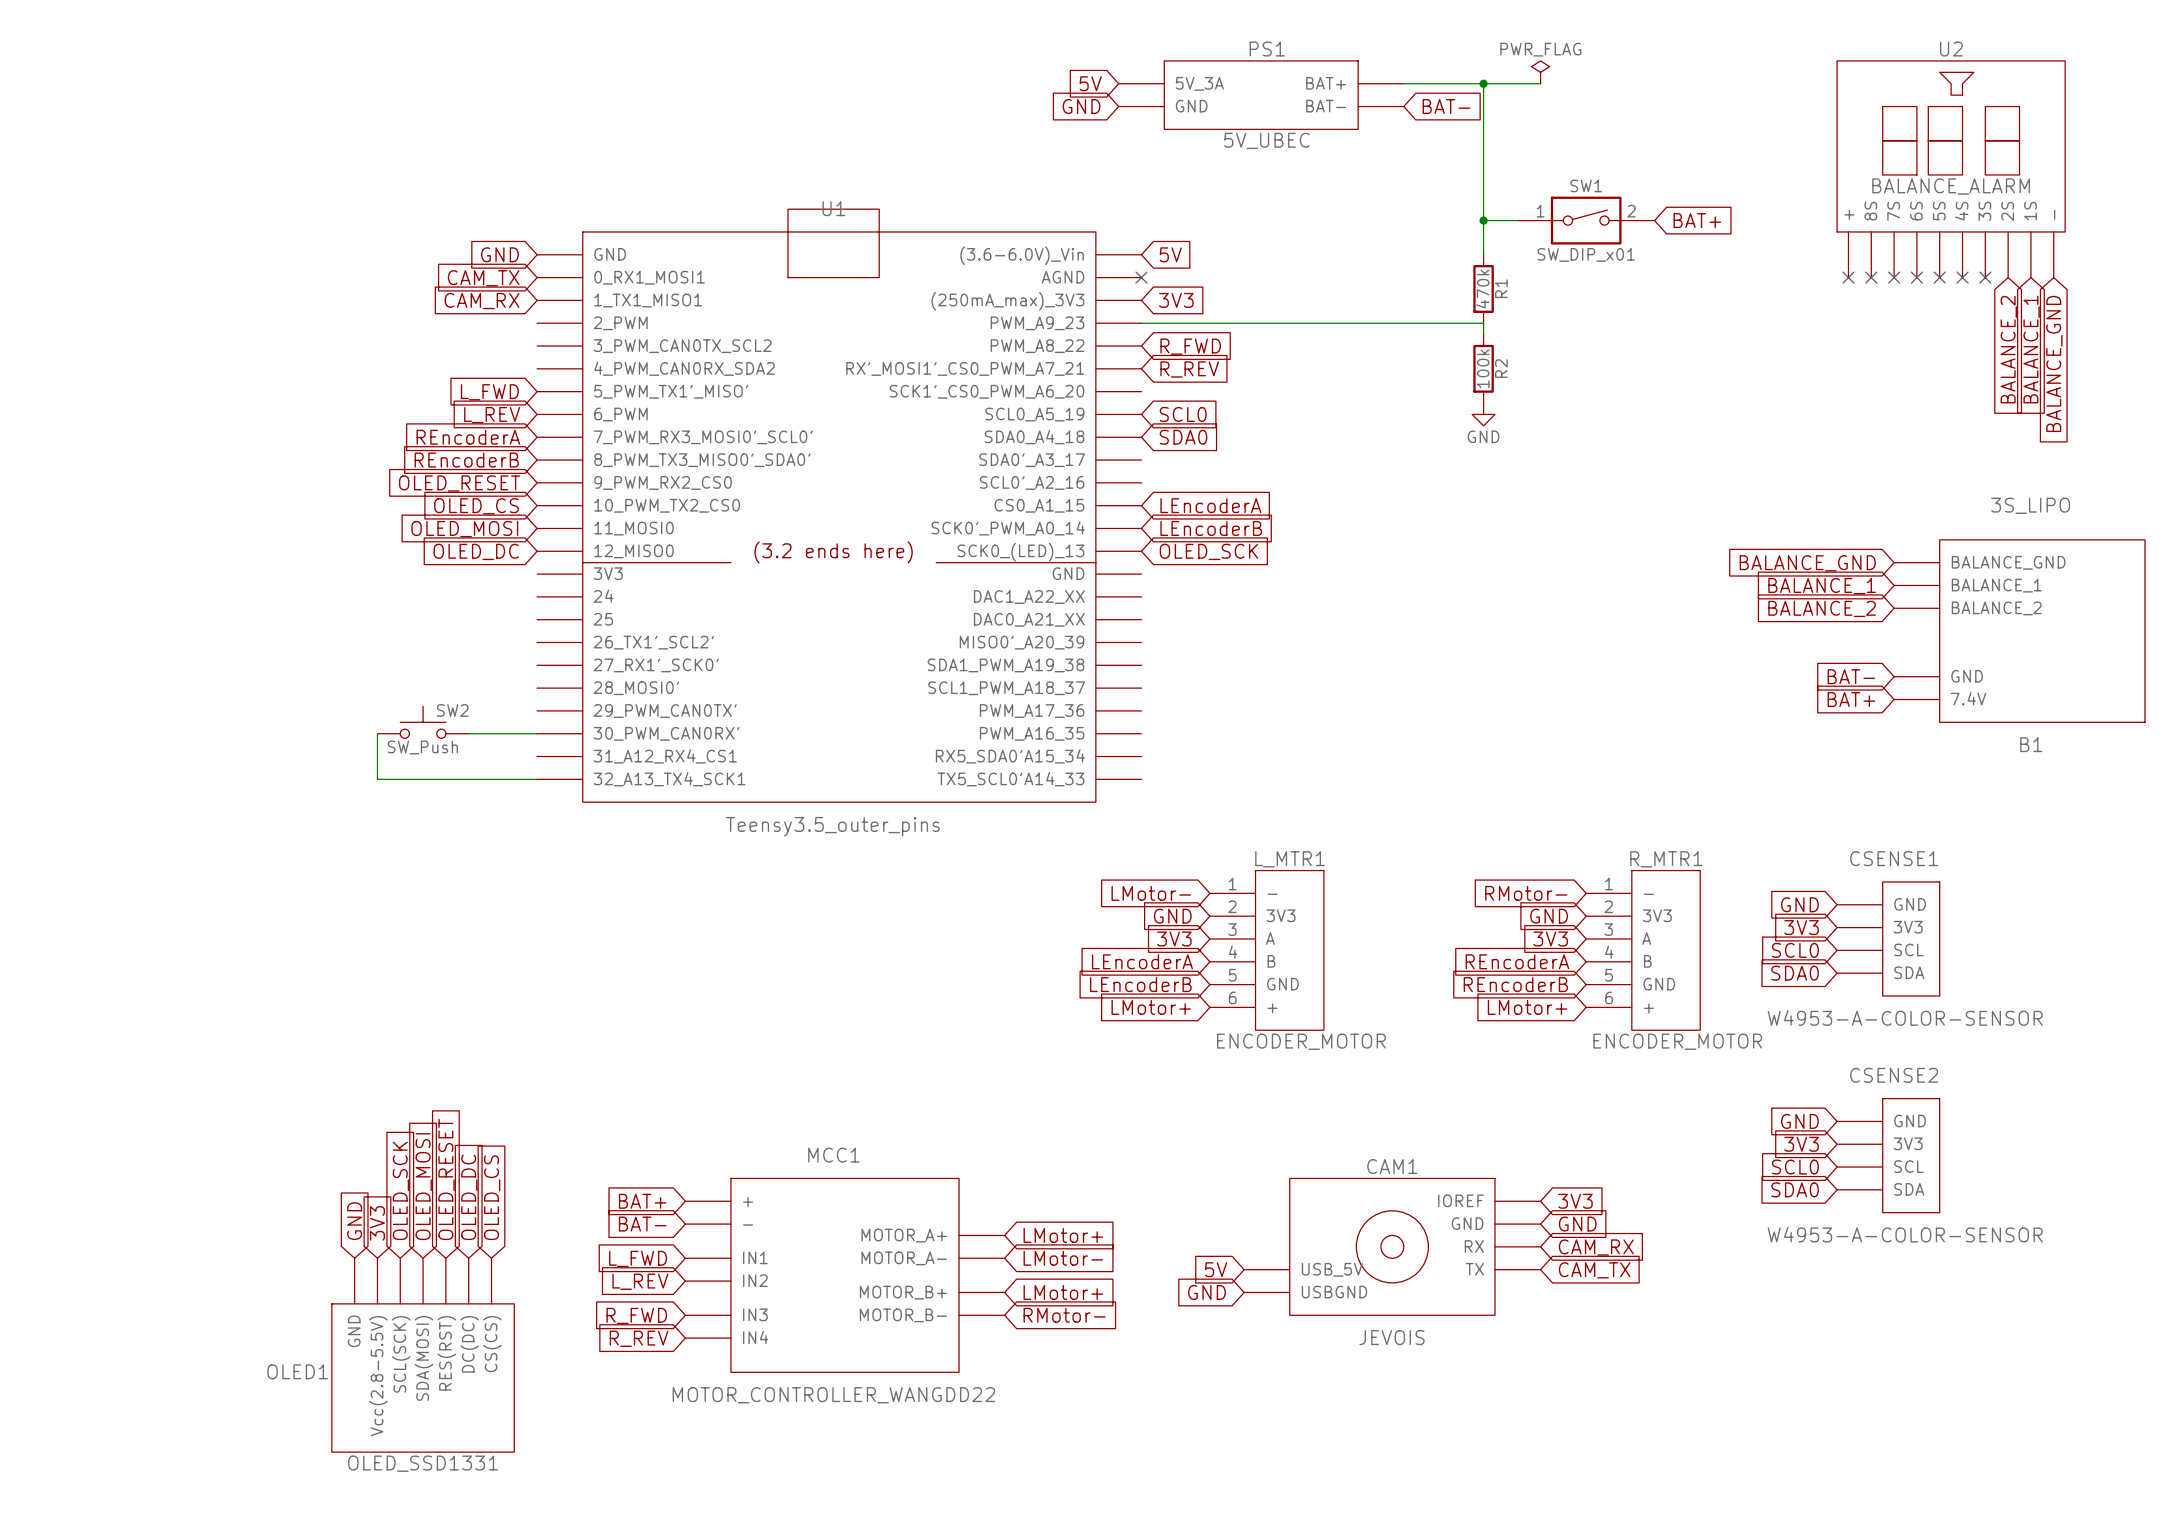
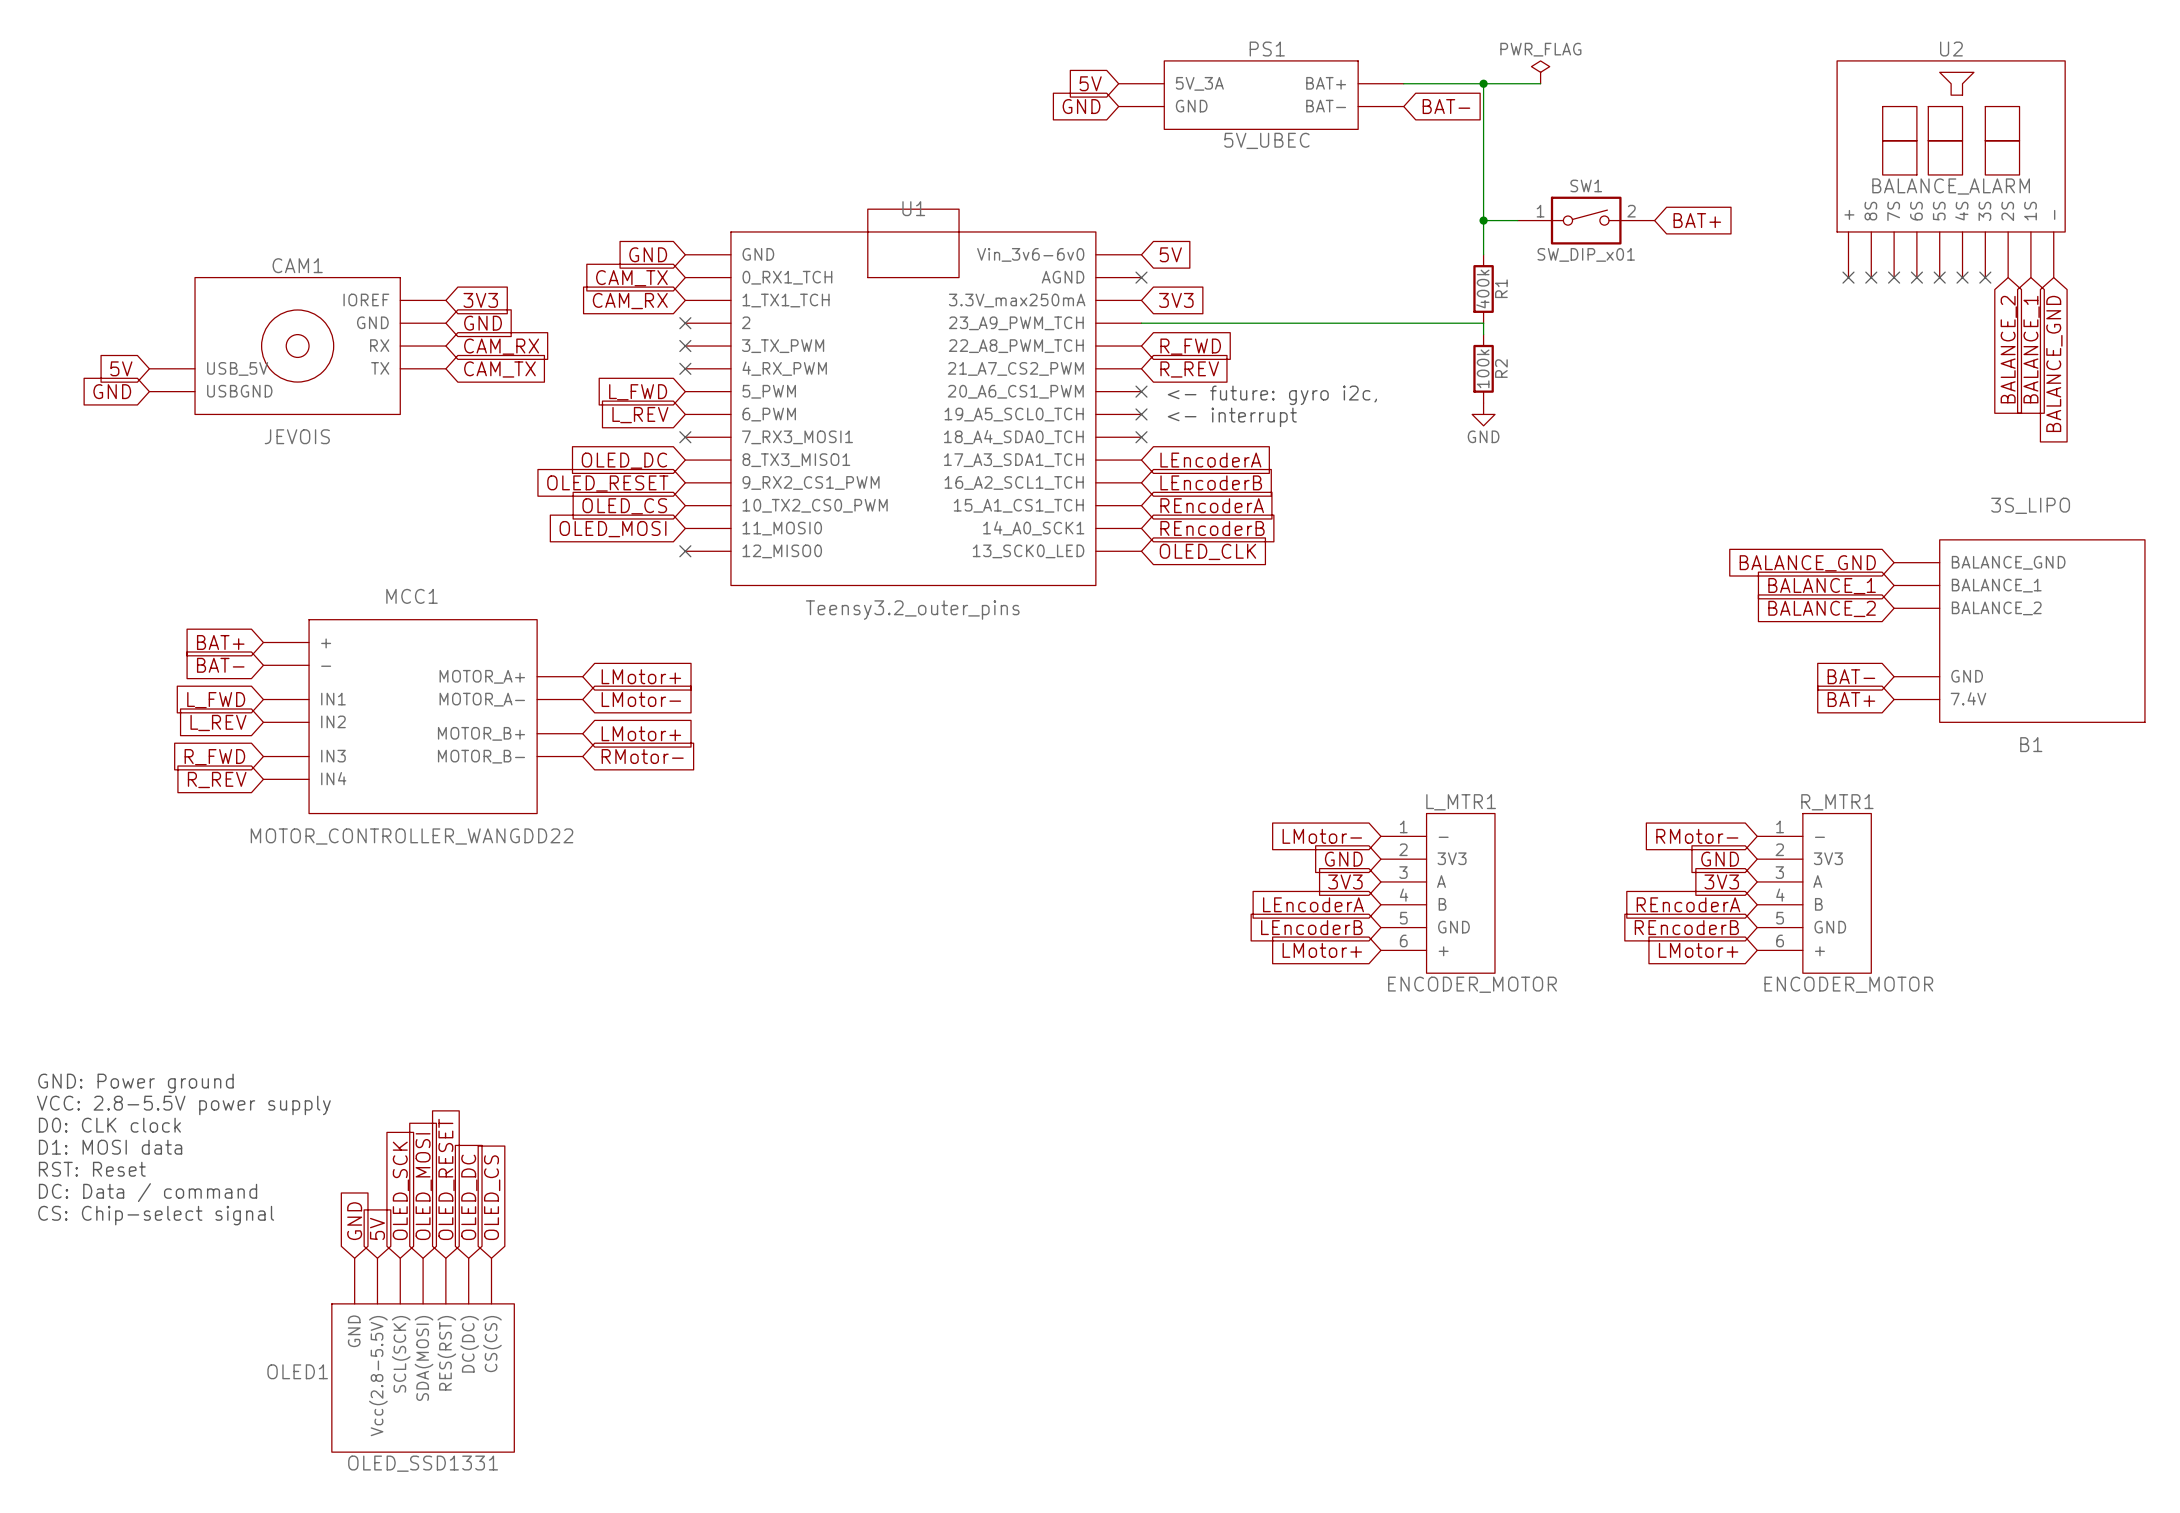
U1 name position: U1 (833, 208) -> U1 (913, 208)
U1 symbol: [537, 209, 1142, 803] -> [685, 209, 1142, 586]
global label: GND (499, 254) -> none
global label: none -> GND (648, 254)
global label: CAM_TX (483, 278) -> none
global label: none -> CAM_TX (631, 278)
R1 value: 470k (1482, 289) -> 400k (1482, 289)
global label: none -> 3V3 (480, 300)
global label: CAM_RX (482, 301) -> none
global label: none -> CAM_RX (630, 301)
global label: none -> GND (483, 323)
no-connect mark: none -> (685, 323)
global label: none -> CAM_RX (501, 346)
no-connect mark: none -> (685, 346)
global label: none -> 5V (121, 368)
no-connect mark: none -> (685, 368)
global label: none -> CAM_TX (499, 369)
global label: none -> GND (112, 391)
no-connect mark: none -> (1141, 391)
global label position: L_FWD (489, 392) -> L_FWD (638, 392)
text: none -> <- future: gyro i2c, (1272, 395)
no-connect mark: none -> (1141, 414)
global label: SCL0 (1183, 414) -> none
global label position: L_REV (492, 415) -> L_REV (640, 415)
text: none -> <- interrupt (1232, 417)
global label: REncoderA (468, 437) -> none
no-connect mark: none -> (685, 437)
no-connect mark: none -> (1141, 437)
global label: SDA0 (1183, 437) -> none
global label: REncoderB (466, 460) -> none
global label: none -> LEncoderA (1210, 460)
global label: none -> LEncoderB (1211, 482)
global label position: OLED_RESET (459, 483) -> OLED_RESET (607, 483)
global label: LEncoderA (1210, 505) -> REncoderA (1212, 505)
global label position: OLED_CS (476, 506) -> OLED_CS (624, 506)
global label: LEncoderB (1211, 528) -> REncoderB (1212, 528)
global label position: OLED_MOSI (464, 529) -> OLED_MOSI (613, 529)
global label position: OLED_DC (476, 551) -> OLED_DC (624, 460)
no-connect mark: none -> (685, 551)
global label: OLED_SCK (1208, 551) -> OLED_CLK (1207, 551)
global label: none -> BAT+ (220, 642)
global label: none -> BAT- (220, 665)
global label: none -> LMotor+ (641, 676)
global label: none -> LMotor- (641, 699)
global label: none -> L_FWD (216, 700)
global label: none -> L_REV (218, 722)
SW2: SW_Push (423, 722) -> none
wire: (377, 733) (377, 779) (537, 779) -> none
wire: (468, 733) (537, 733) -> none
global label: none -> LMotor+ (641, 733)
global label: none -> RMotor- (642, 756)
global label: none -> R_FWD (214, 757)
global label: none -> R_REV (217, 779)
U1 value: Teensy3.5_outer_pins (832, 826) -> Teensy3.2_outer_pins (912, 610)
global label: none -> GND (1343, 859)
global label: none -> GND (1720, 859)
global label: none -> 3V3 (1345, 881)
global label: none -> 3V3 (1721, 881)
global label position: LMotor- (1151, 893) -> LMotor- (1322, 836)
global label position: RMotor- (1526, 893) -> RMotor- (1697, 836)
global label: GND (1799, 904) -> none
global label: GND (1172, 916) -> none
global label: GND (1549, 916) -> none
global label: 3V3 (1801, 927) -> none
global label: 3V3 (1174, 938) -> none
global label: 3V3 (1550, 938) -> none
CSENSE1: W4953-A-COLOR-SENSOR (1888, 938) -> none
L_MTR1 position: (1266, 950) -> (1437, 893)
global label: none -> LMotor+ (1322, 950)
R_MTR1 position: (1643, 950) -> (1814, 893)
global label: none -> LMotor+ (1698, 950)
global label: SCL0 (1795, 950) -> none
global label position: LEncoderA (1142, 961) -> LEncoderA (1313, 904)
global label position: REncoderA (1517, 961) -> REncoderA (1688, 904)
global label: SDA0 (1795, 973) -> none
global label position: LEncoderB (1140, 984) -> LEncoderB (1311, 927)
global label position: REncoderB (1515, 984) -> REncoderB (1686, 927)
global label: LMotor+ (1151, 1007) -> none
global label: LMotor+ (1527, 1007) -> none
text: none -> GND: Power ground (135, 1083)
text: none -> VCC: 2.8-5.5V power supply (183, 1105)
global label: GND (1799, 1121) -> none
text: none -> D0: CLK clock (109, 1125)
global label: 3V3 (1801, 1144) -> none
text: none -> D1: MOSI data (110, 1147)
CSENSE2: W4953-A-COLOR-SENSOR (1888, 1155) -> none
global label: SCL0 (1795, 1167) -> none
text: none -> RST: Reset (92, 1169)
global label: SDA0 (1795, 1189) -> none
text: none -> DC: Data / command (148, 1192)
global label: BAT+ (642, 1201) -> none
global label: 3V3 (1575, 1201) -> none
text: none -> CS: Chip-select signal (156, 1215)
global label: 3V3 (377, 1223) -> 5V (377, 1228)
global label: BAT- (642, 1224) -> none
global label: GND (1577, 1224) -> none
global label: LMotor+ (1063, 1235) -> none
CAM1 position: (1392, 1246) -> (297, 346)
global label: CAM_RX (1596, 1247) -> none
global label: L_FWD (638, 1258) -> none
global label: LMotor- (1063, 1258) -> none
global label: 5V (1216, 1269) -> none
global label: CAM_TX (1594, 1270) -> none
MCC1 position: (845, 1275) -> (423, 716)
global label: L_REV (640, 1281) -> none
global label: LMotor+ (1063, 1292) -> none
global label: GND (1206, 1292) -> none
global label: R_FWD (636, 1315) -> none
global label: RMotor- (1064, 1315) -> none
global label: R_REV (639, 1338) -> none

